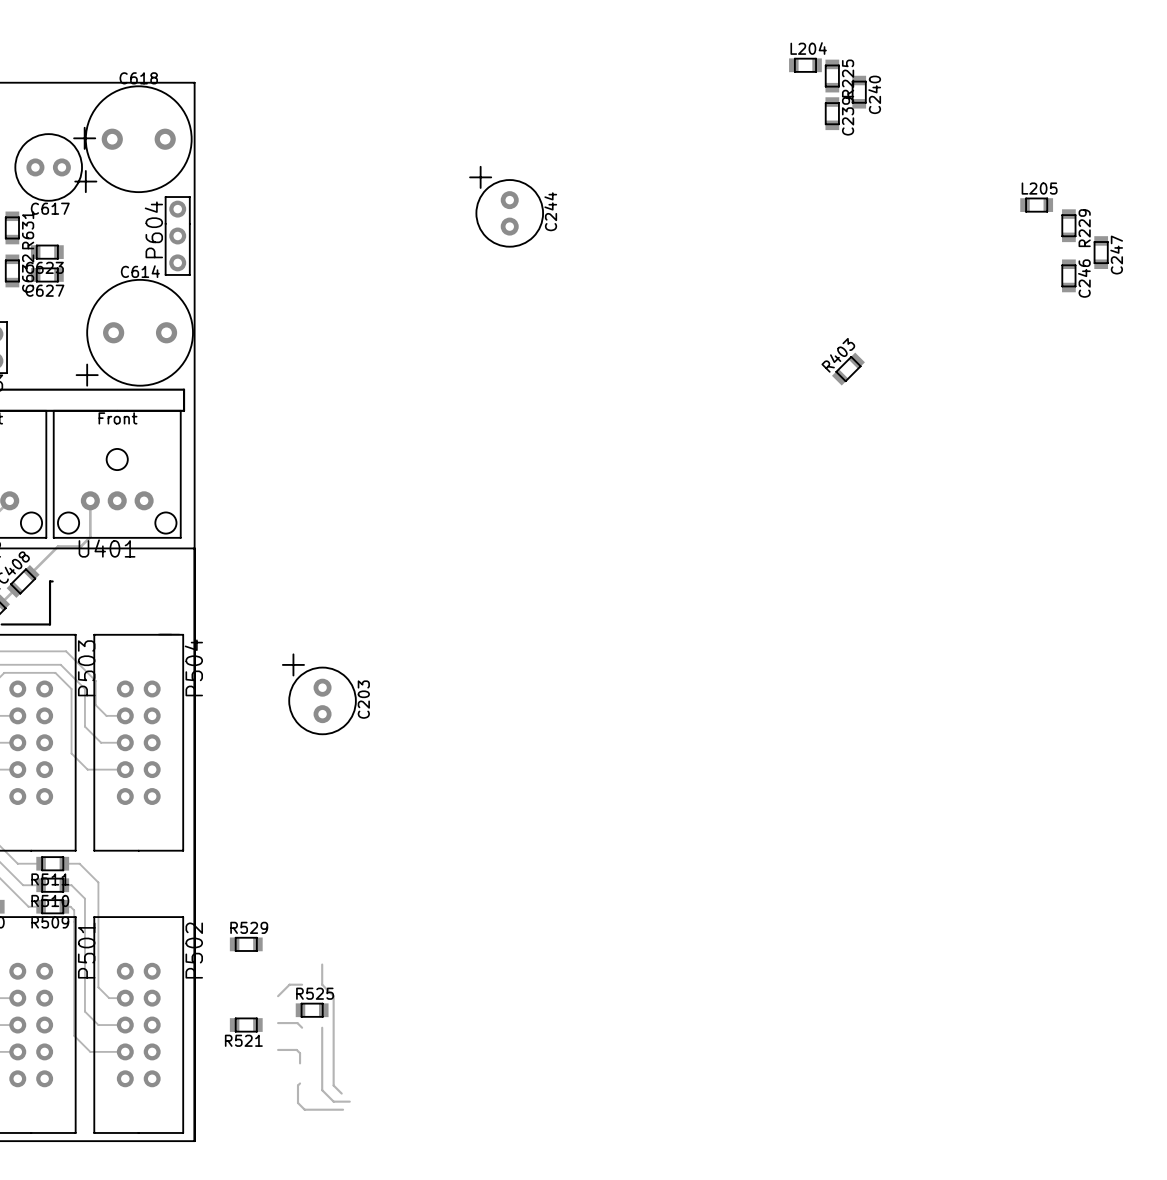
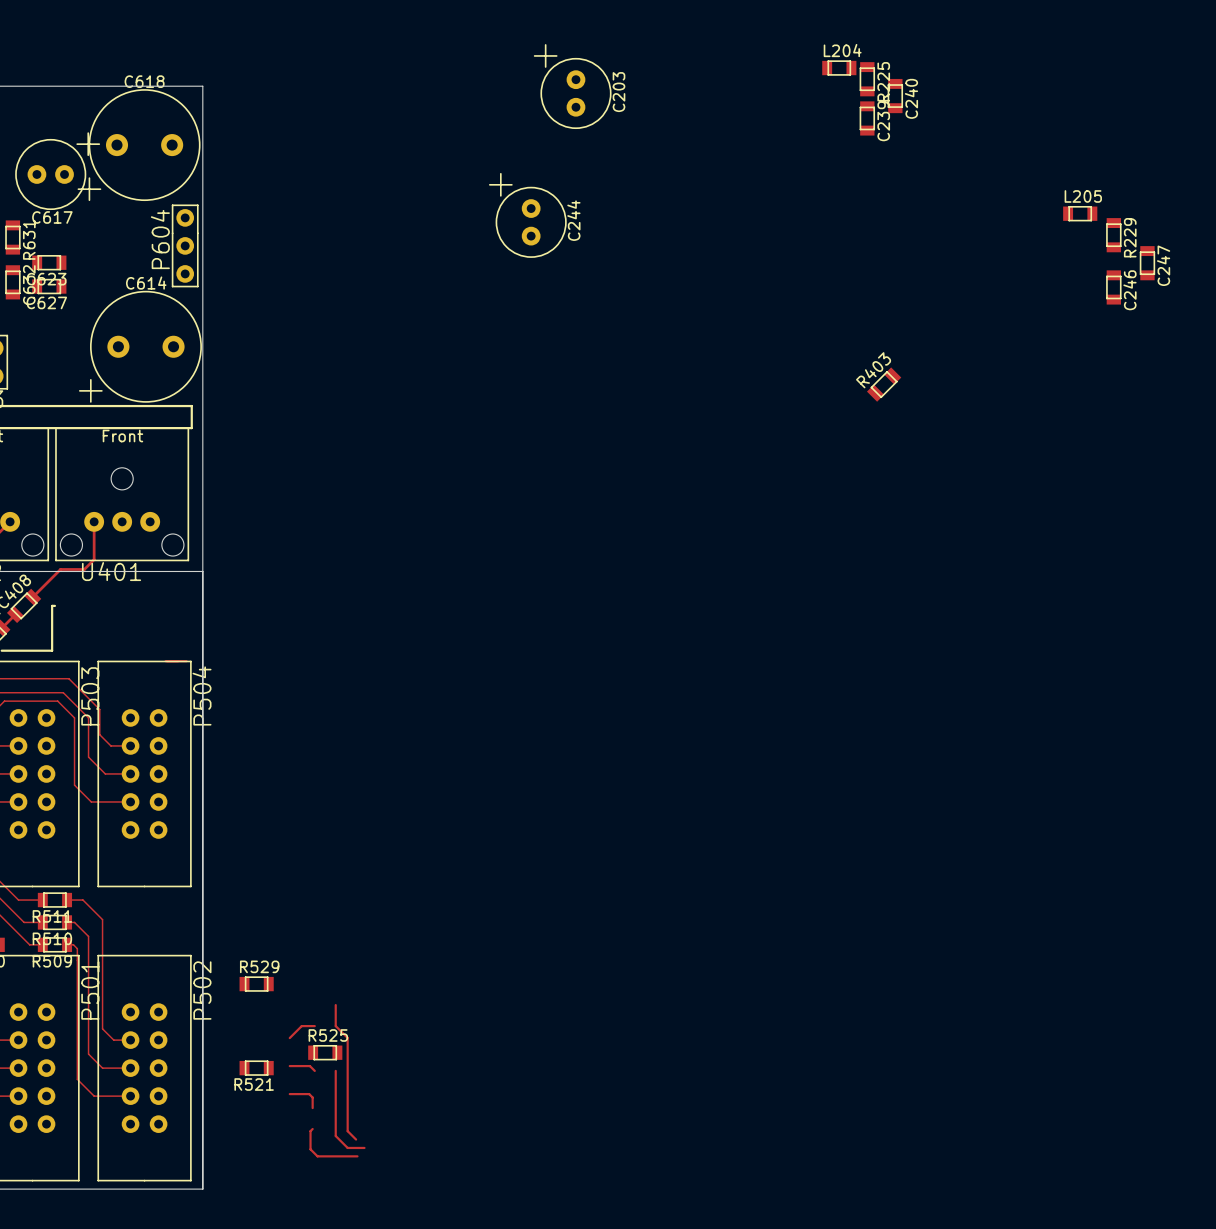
C203 position: (319, 694) -> (572, 86)

